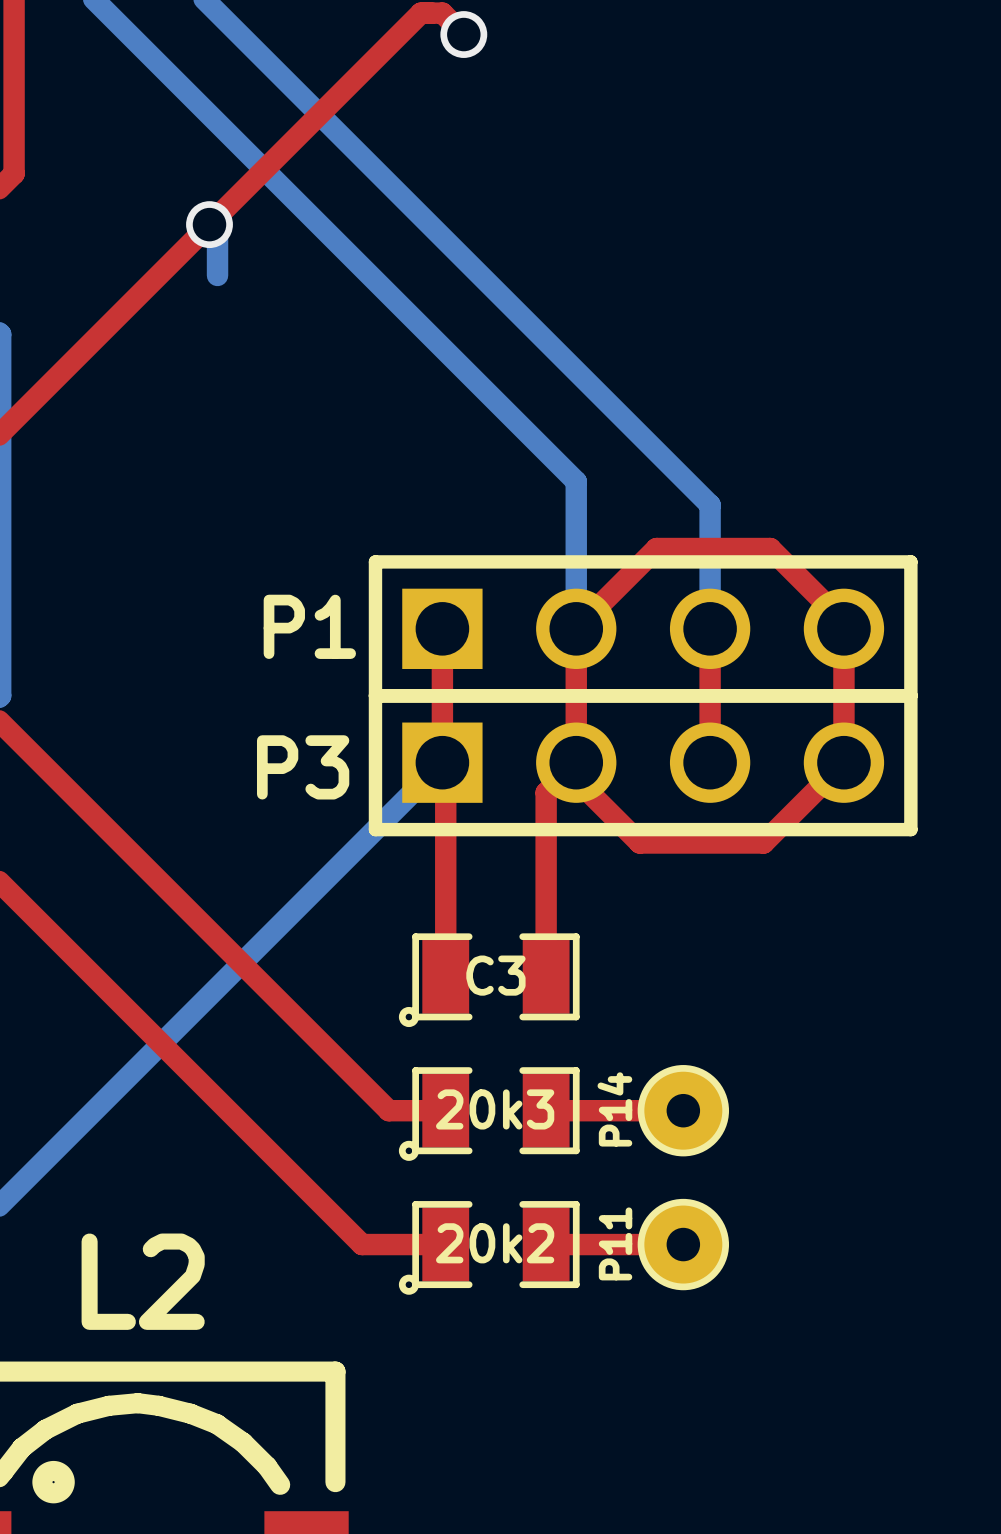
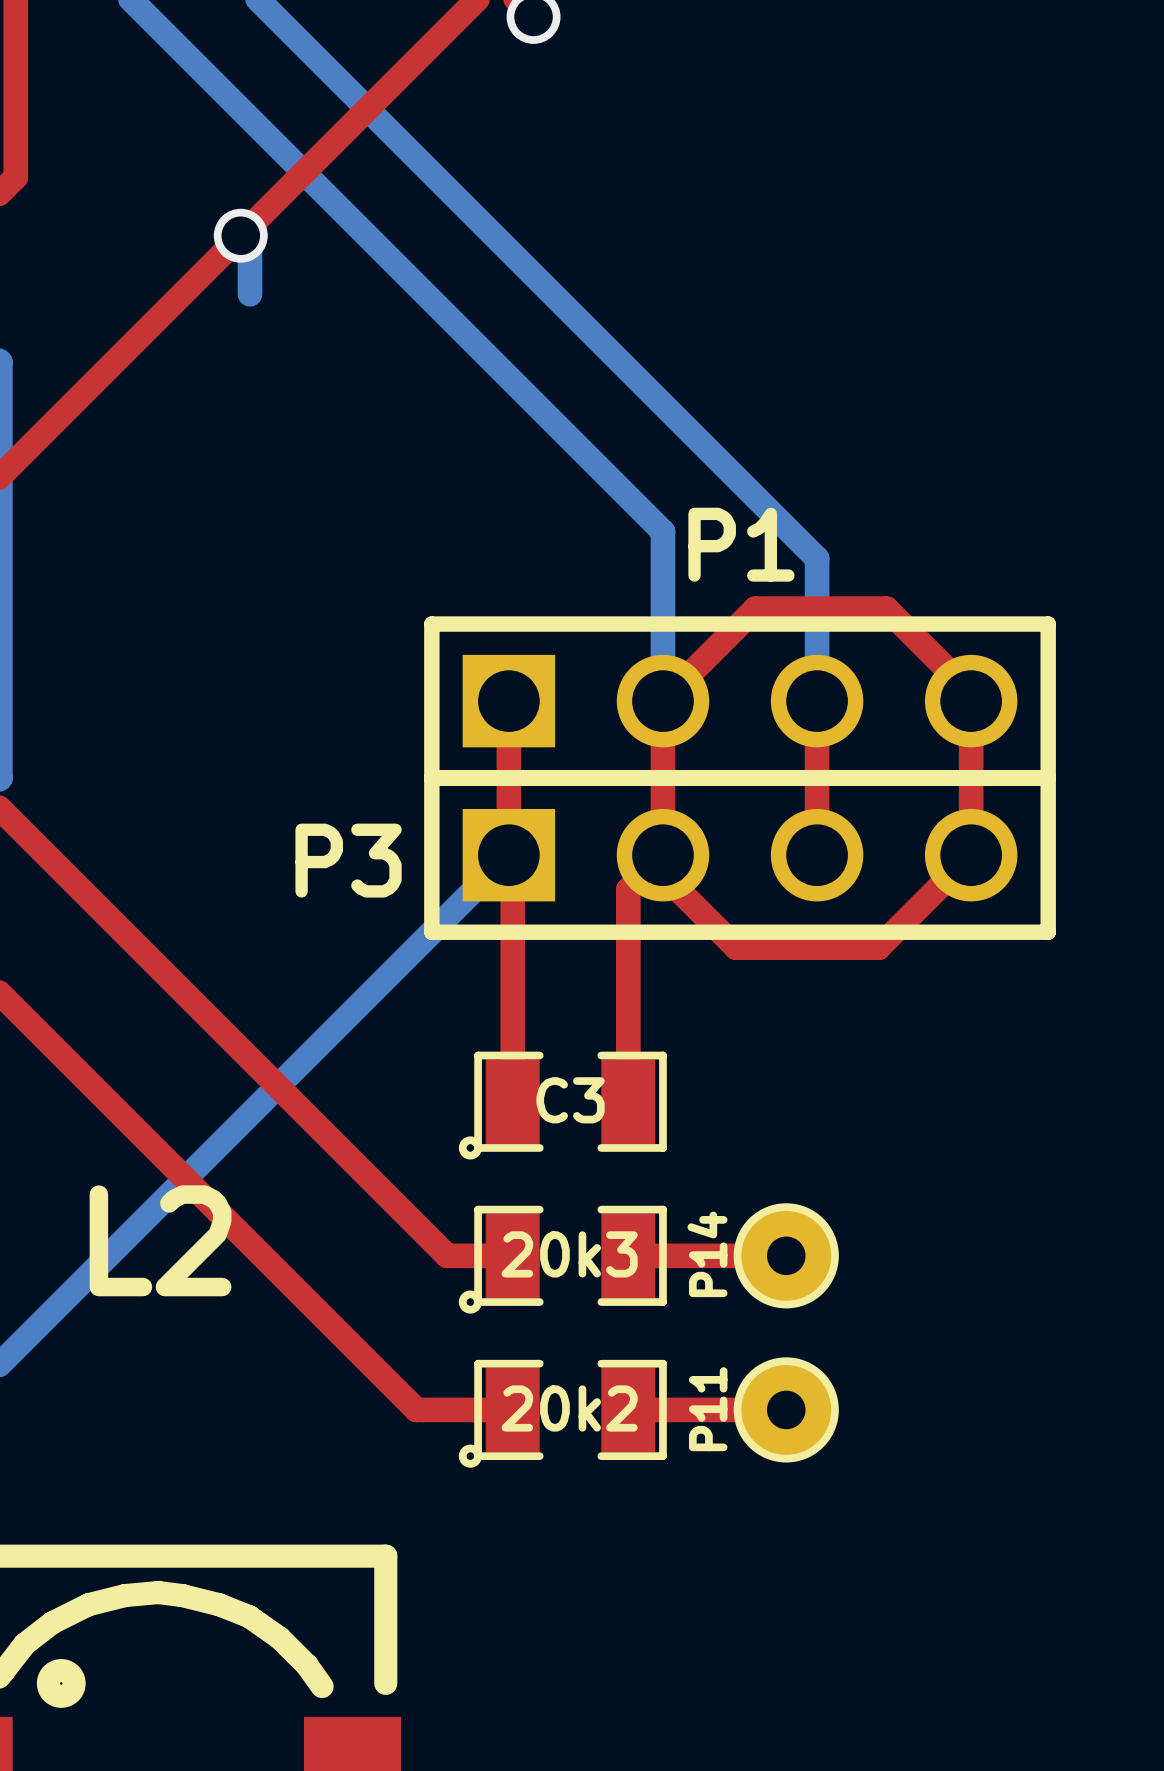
P1 name position: P1 (309, 626) -> P1 (741, 544)
L2 name position: L2 (143, 1281) -> L2 (160, 1240)

